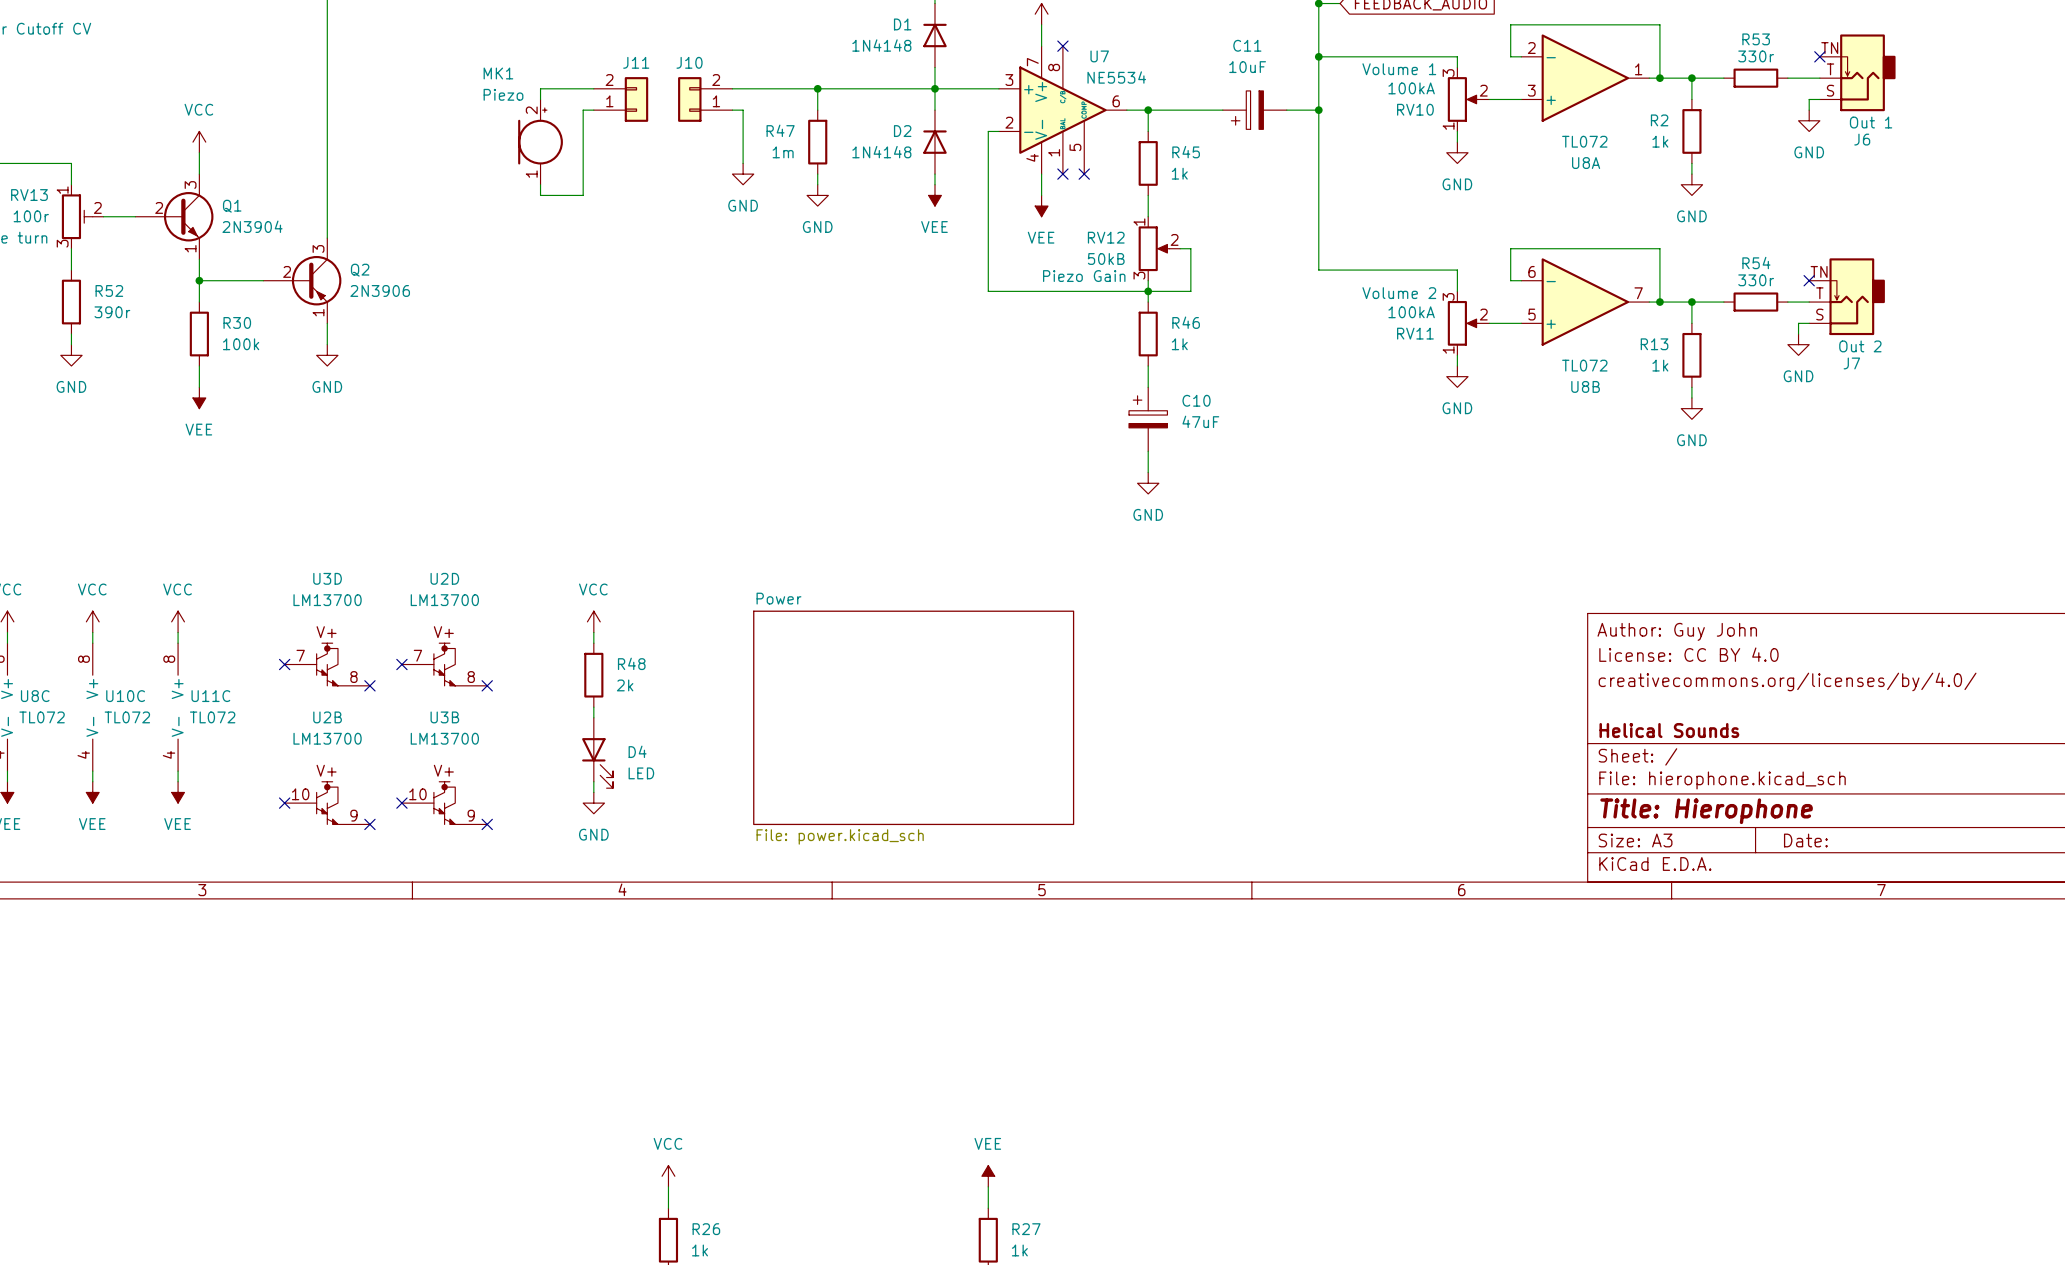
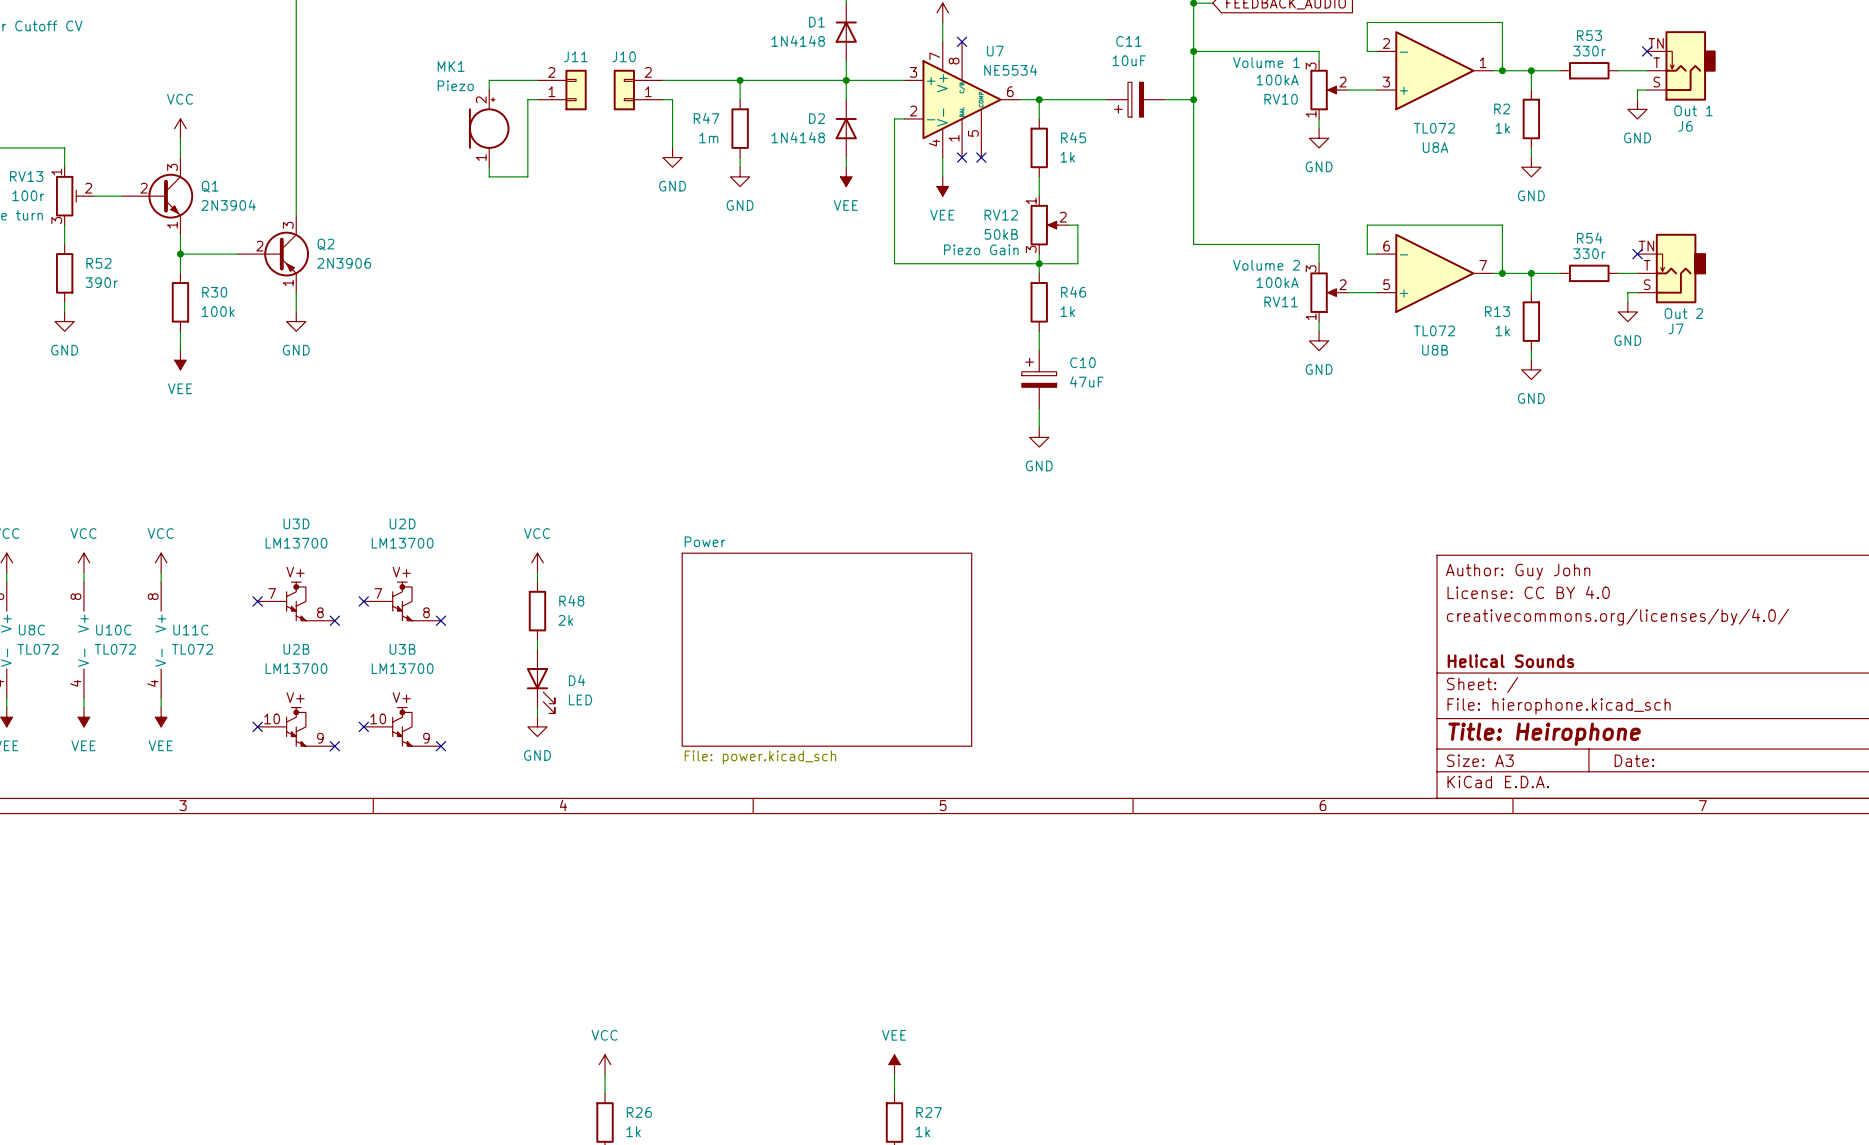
title block: Title: Hierophone (1706, 811) -> Title: Heirophone (1544, 734)

